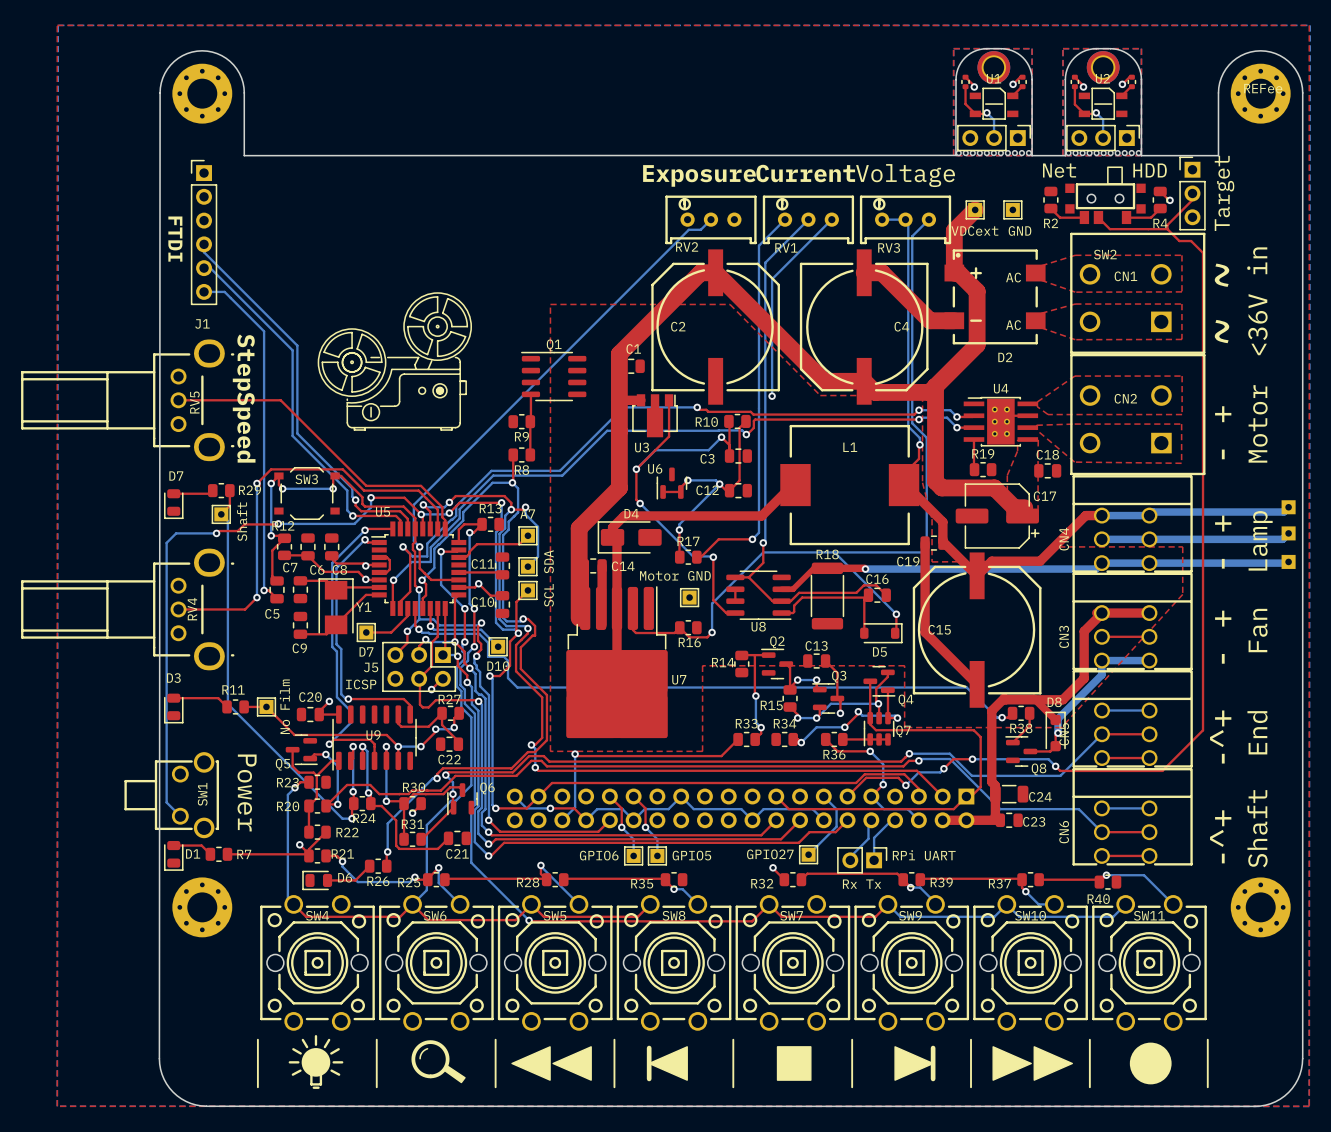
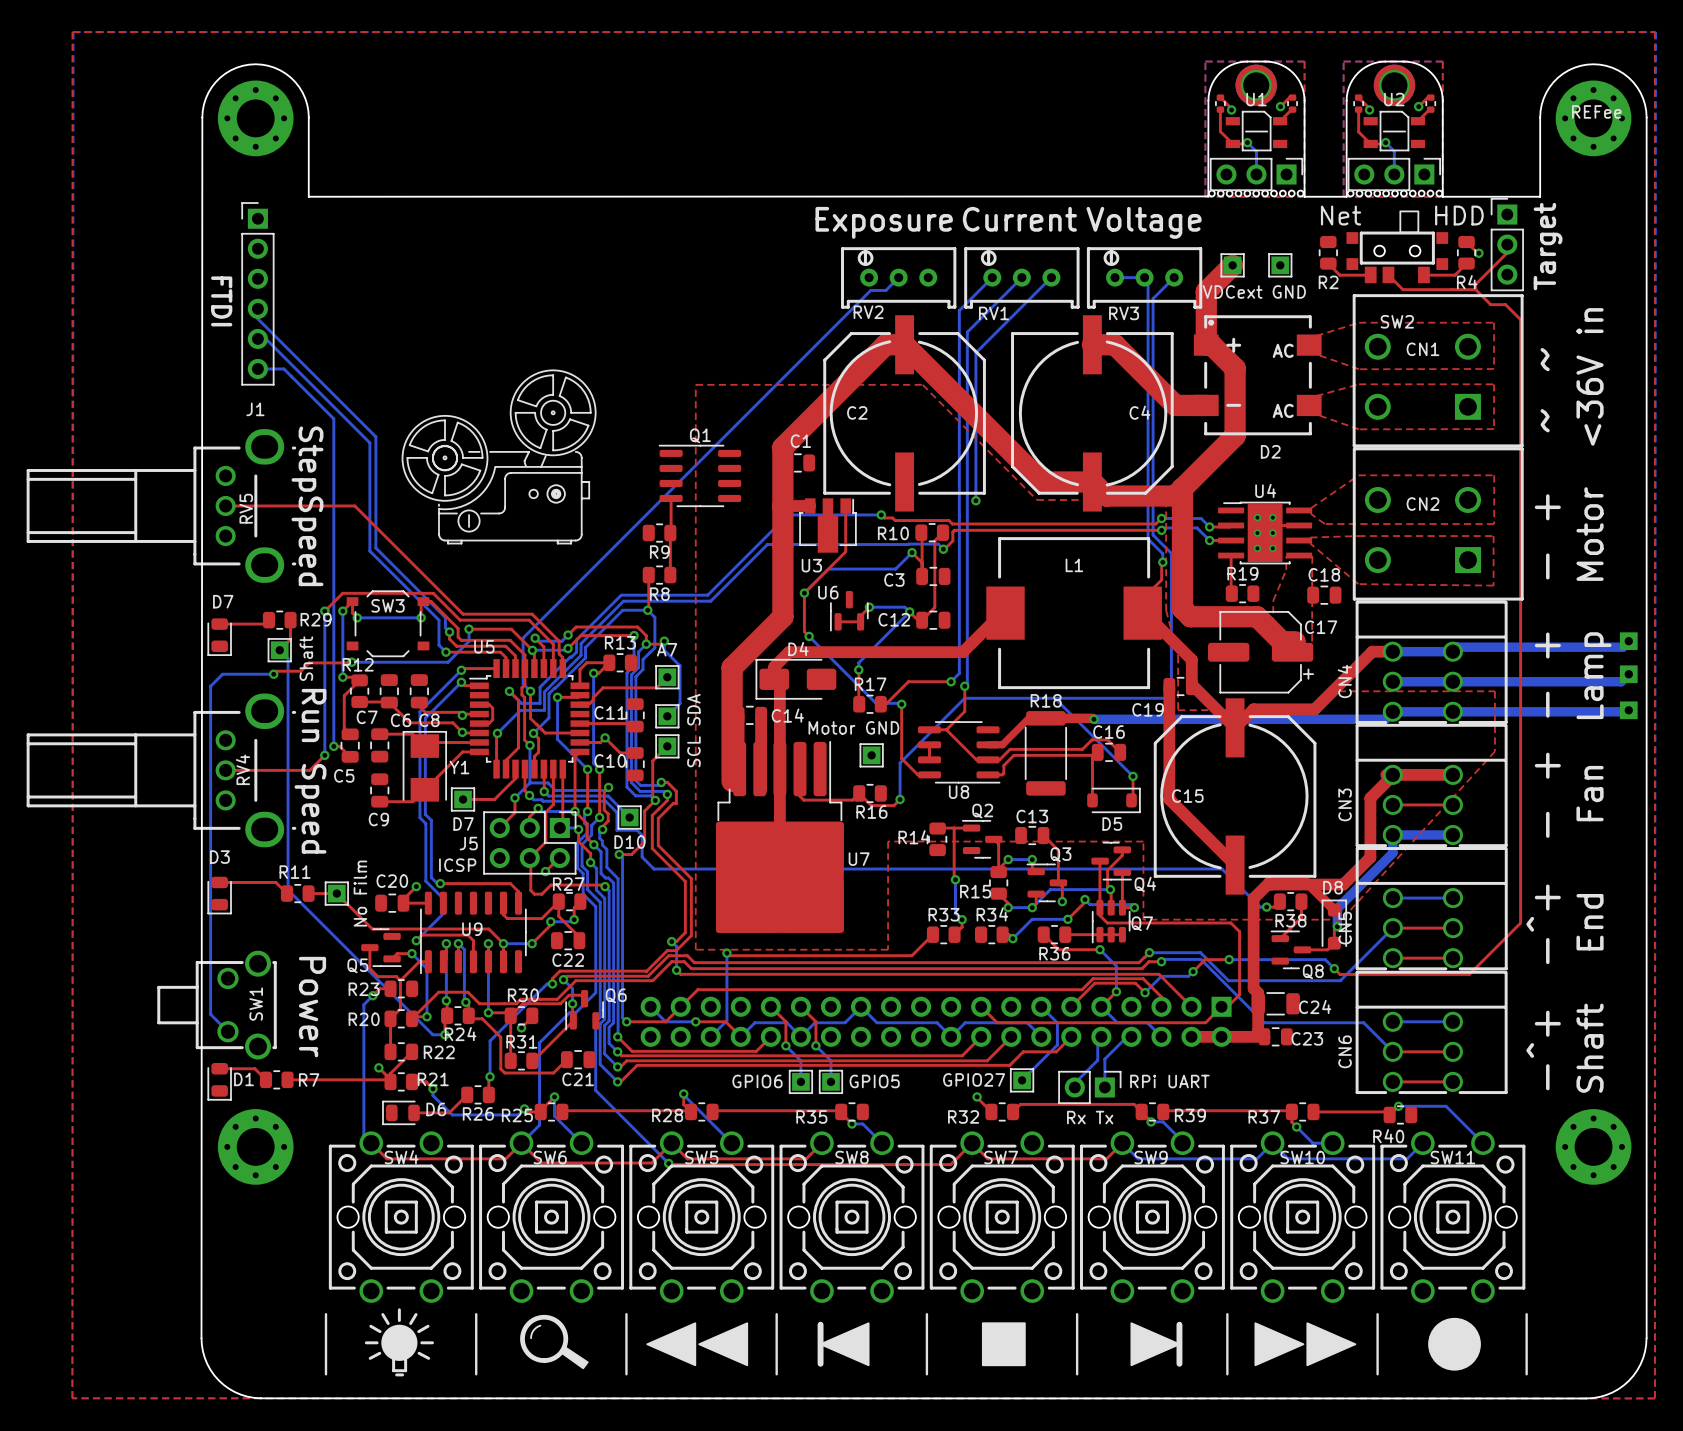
text: none -> Run Speed (310, 771)

